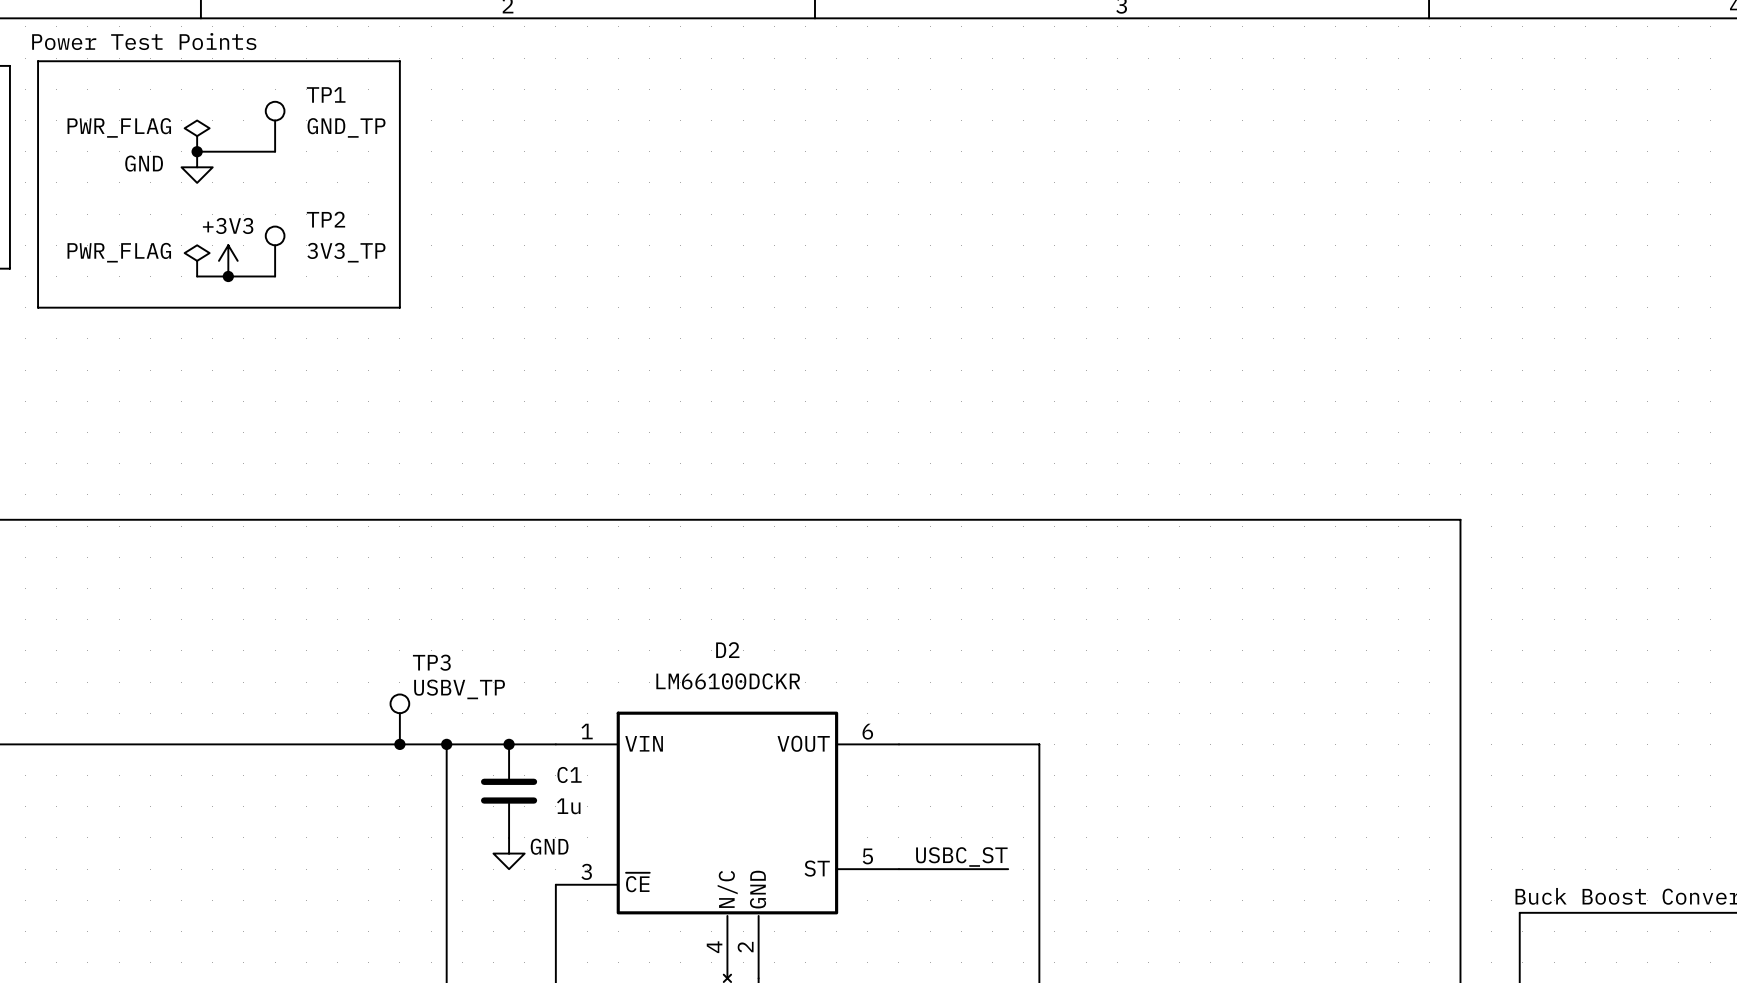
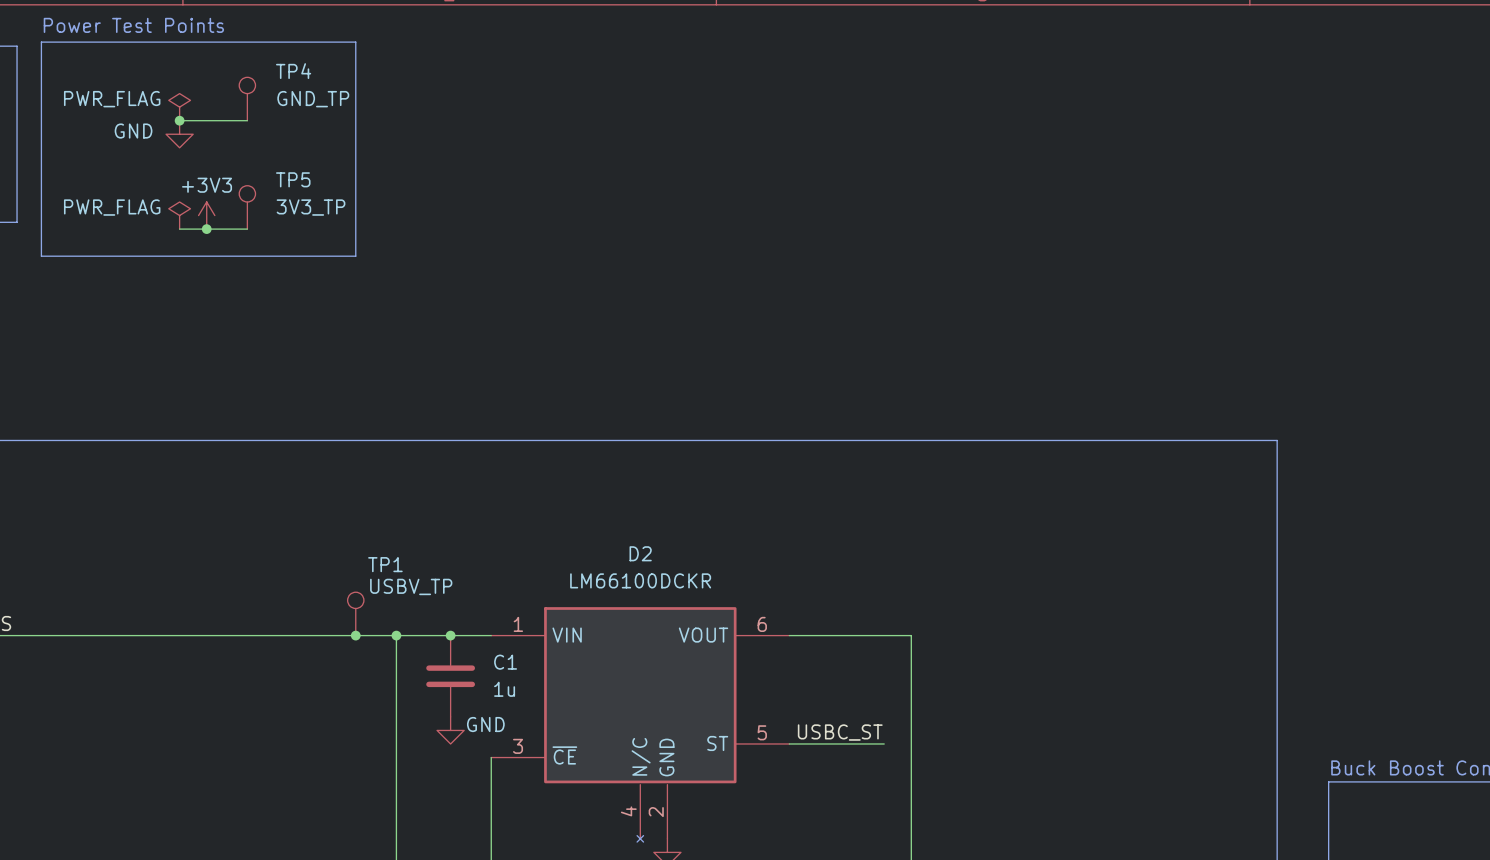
TP1 name: TP1 (326, 94) -> TP4 (293, 71)
TP2 name: TP2 (326, 219) -> TP5 (293, 179)
TP3 name: TP3 (431, 662) -> TP1 (385, 564)

